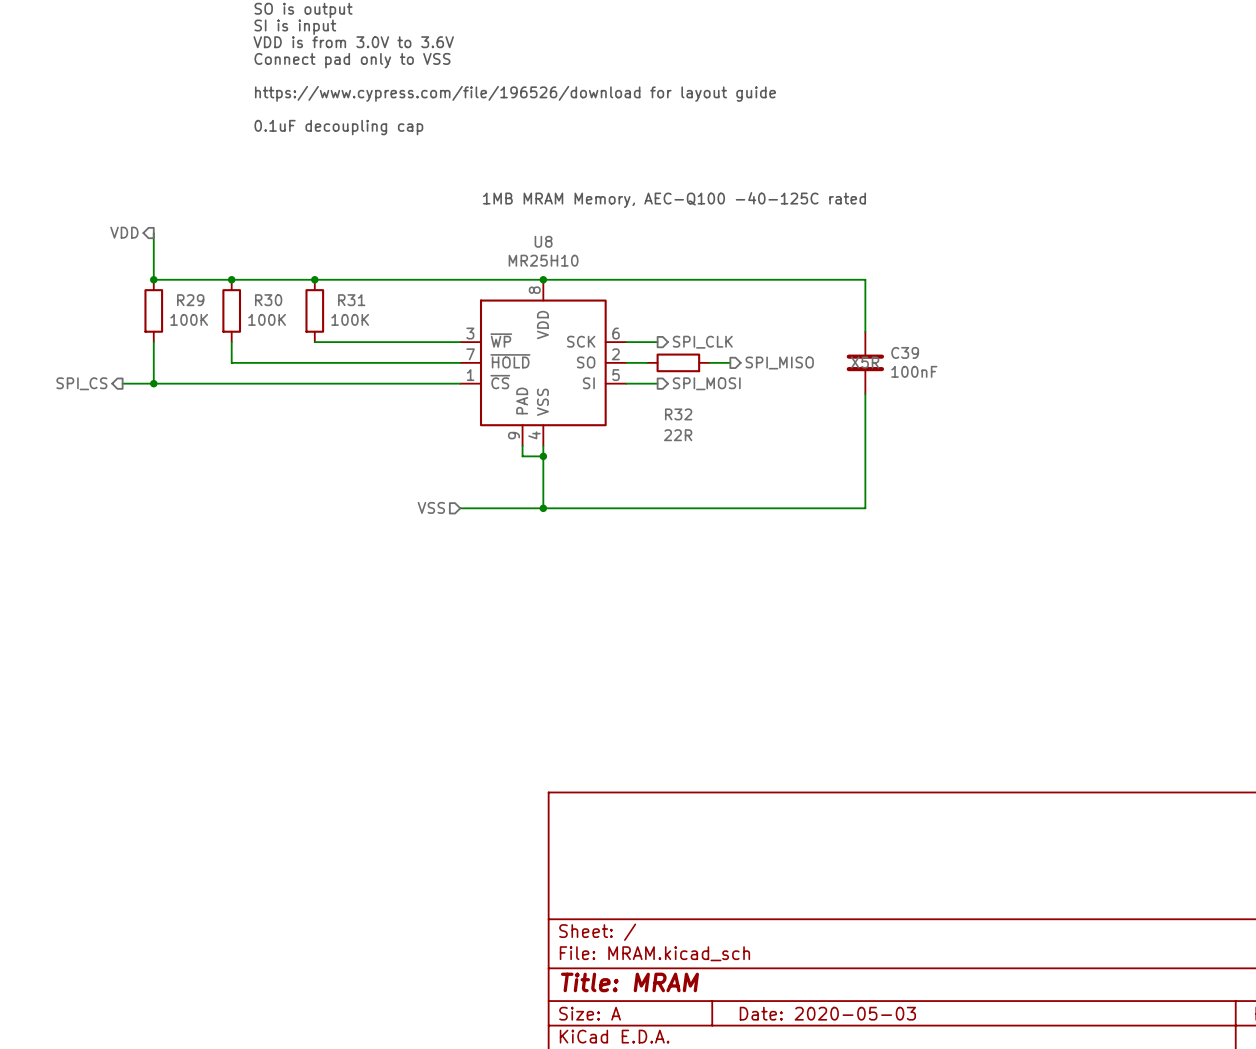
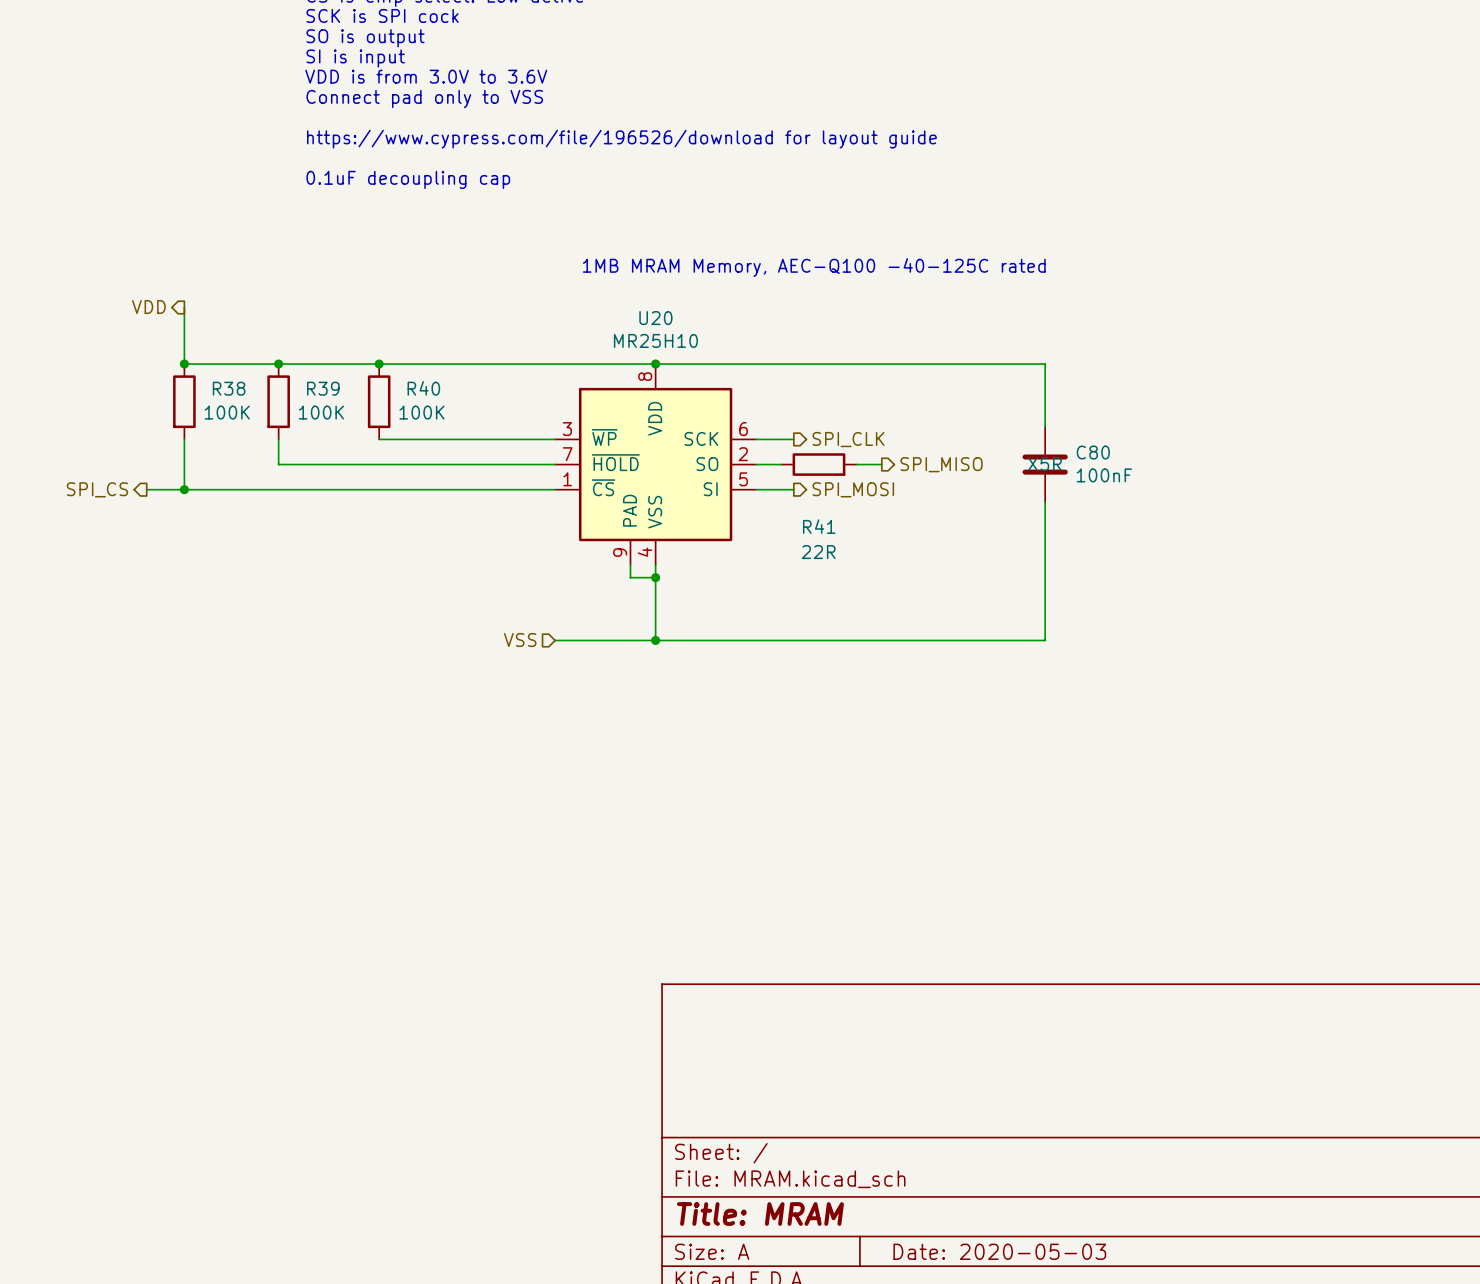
U8 name: U8 (543, 241) -> U20 (655, 318)
R29 name: R29 (190, 300) -> R38 (229, 388)
R30 name: R30 (268, 300) -> R39 (323, 388)
R31 name: R31 (351, 300) -> R40 (423, 388)
C39 name: C39 (905, 352) -> C80 (1093, 452)
R32 name: R32 (678, 414) -> R41 (819, 526)

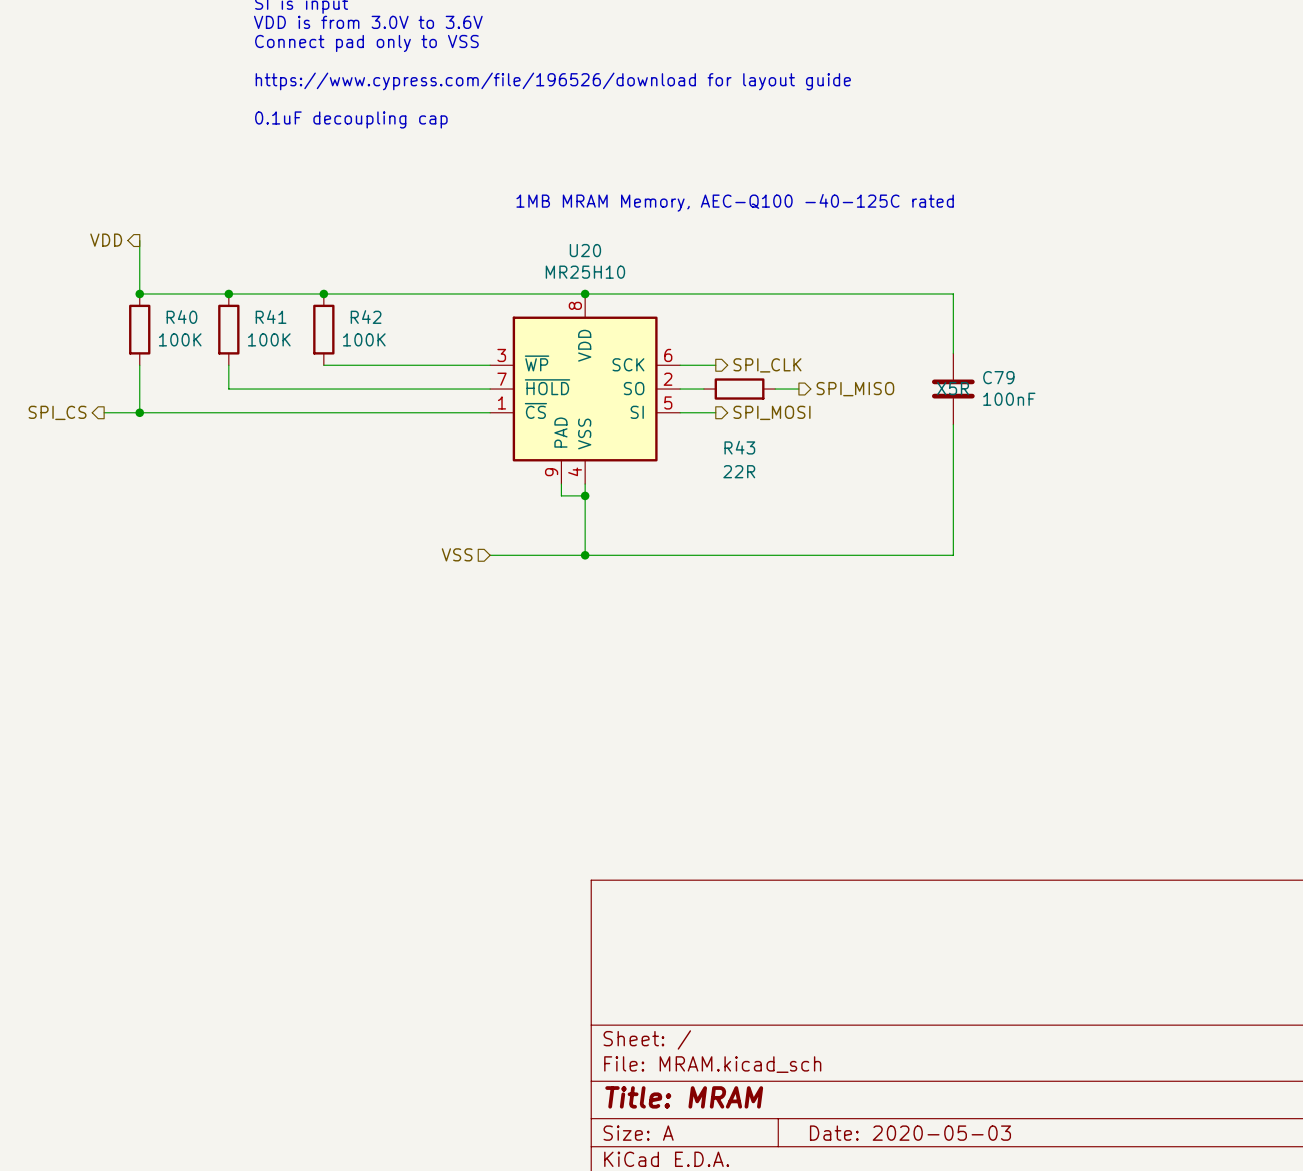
R38 name: R38 (229, 388) -> R40 (181, 317)
R39 name: R39 (323, 388) -> R41 (271, 317)
R40 name: R40 (423, 388) -> R42 (366, 317)
C80 name: C80 (1093, 452) -> C79 (998, 377)
R41 name: R41 (819, 526) -> R43 (739, 447)

